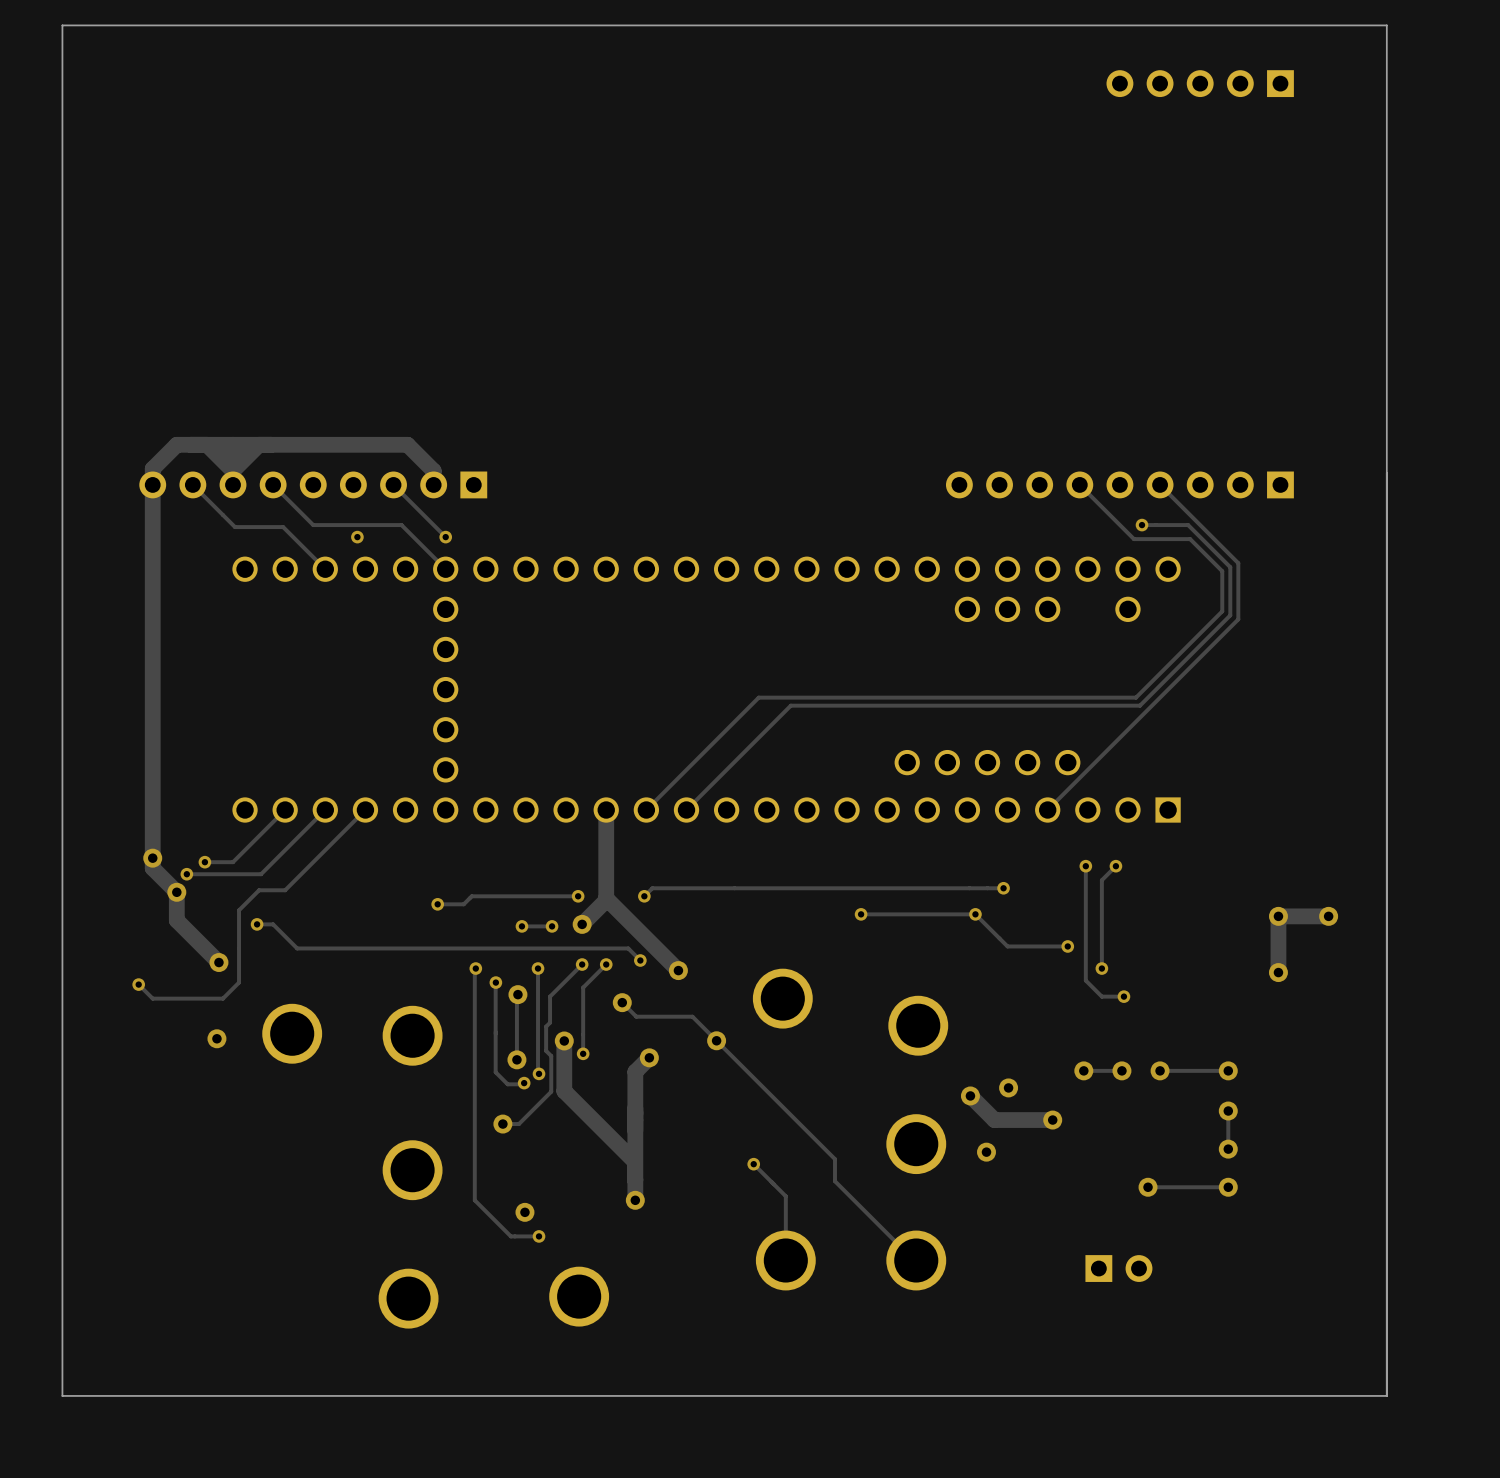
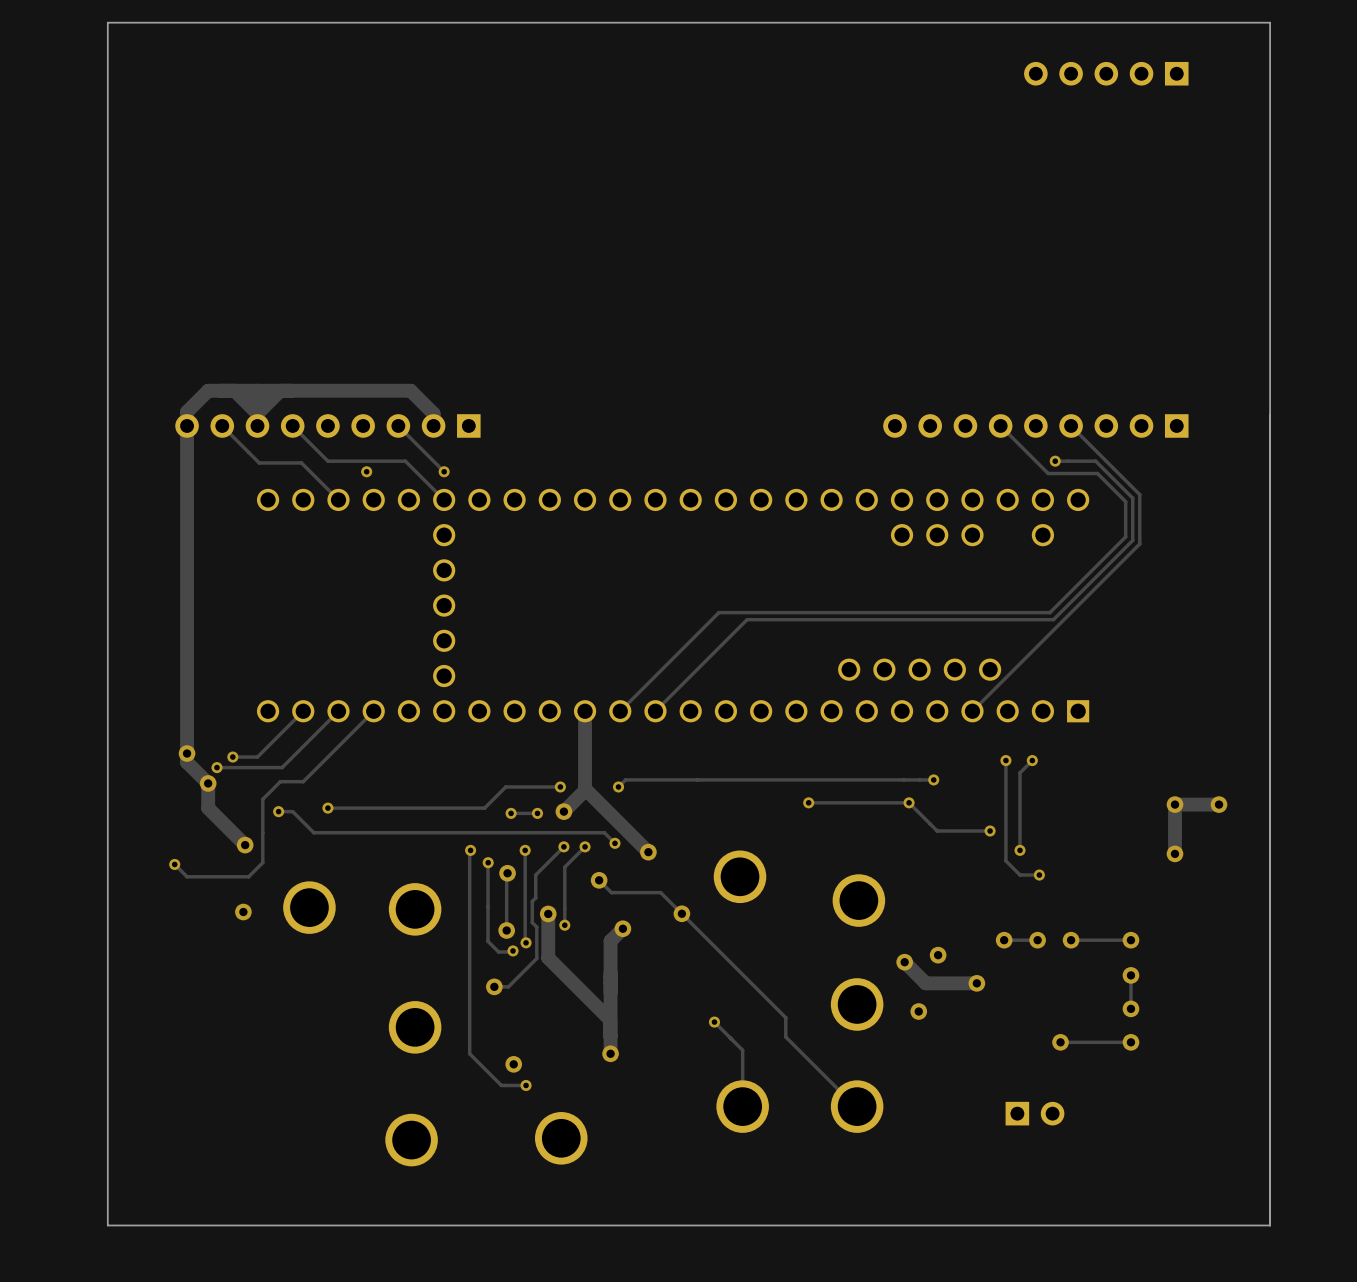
track: (515, 896) (471, 896) (463, 904) (437, 904) -> (505, 786) (484, 808) (327, 808)
via: (437, 904) -> none
via: none -> (327, 808)

